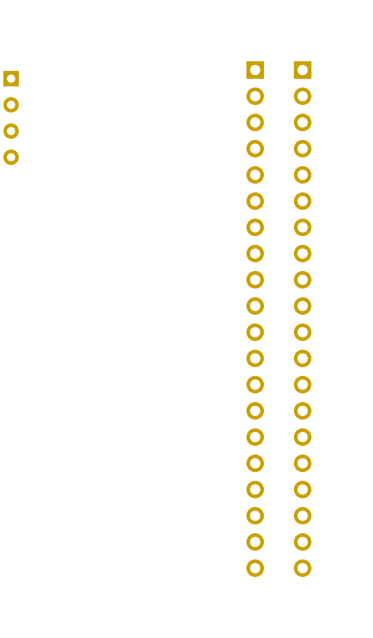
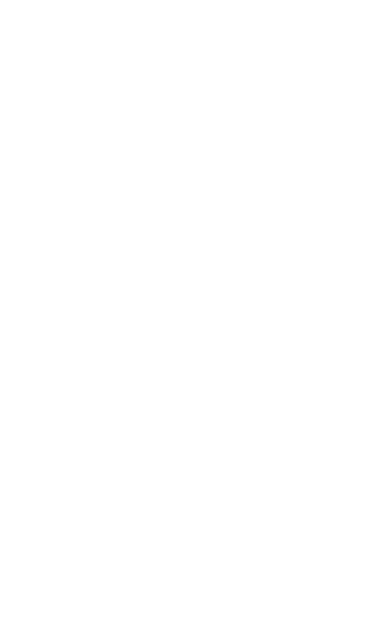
part: (11, 117) -> none
part: (255, 319) -> none
part: (302, 319) -> none

